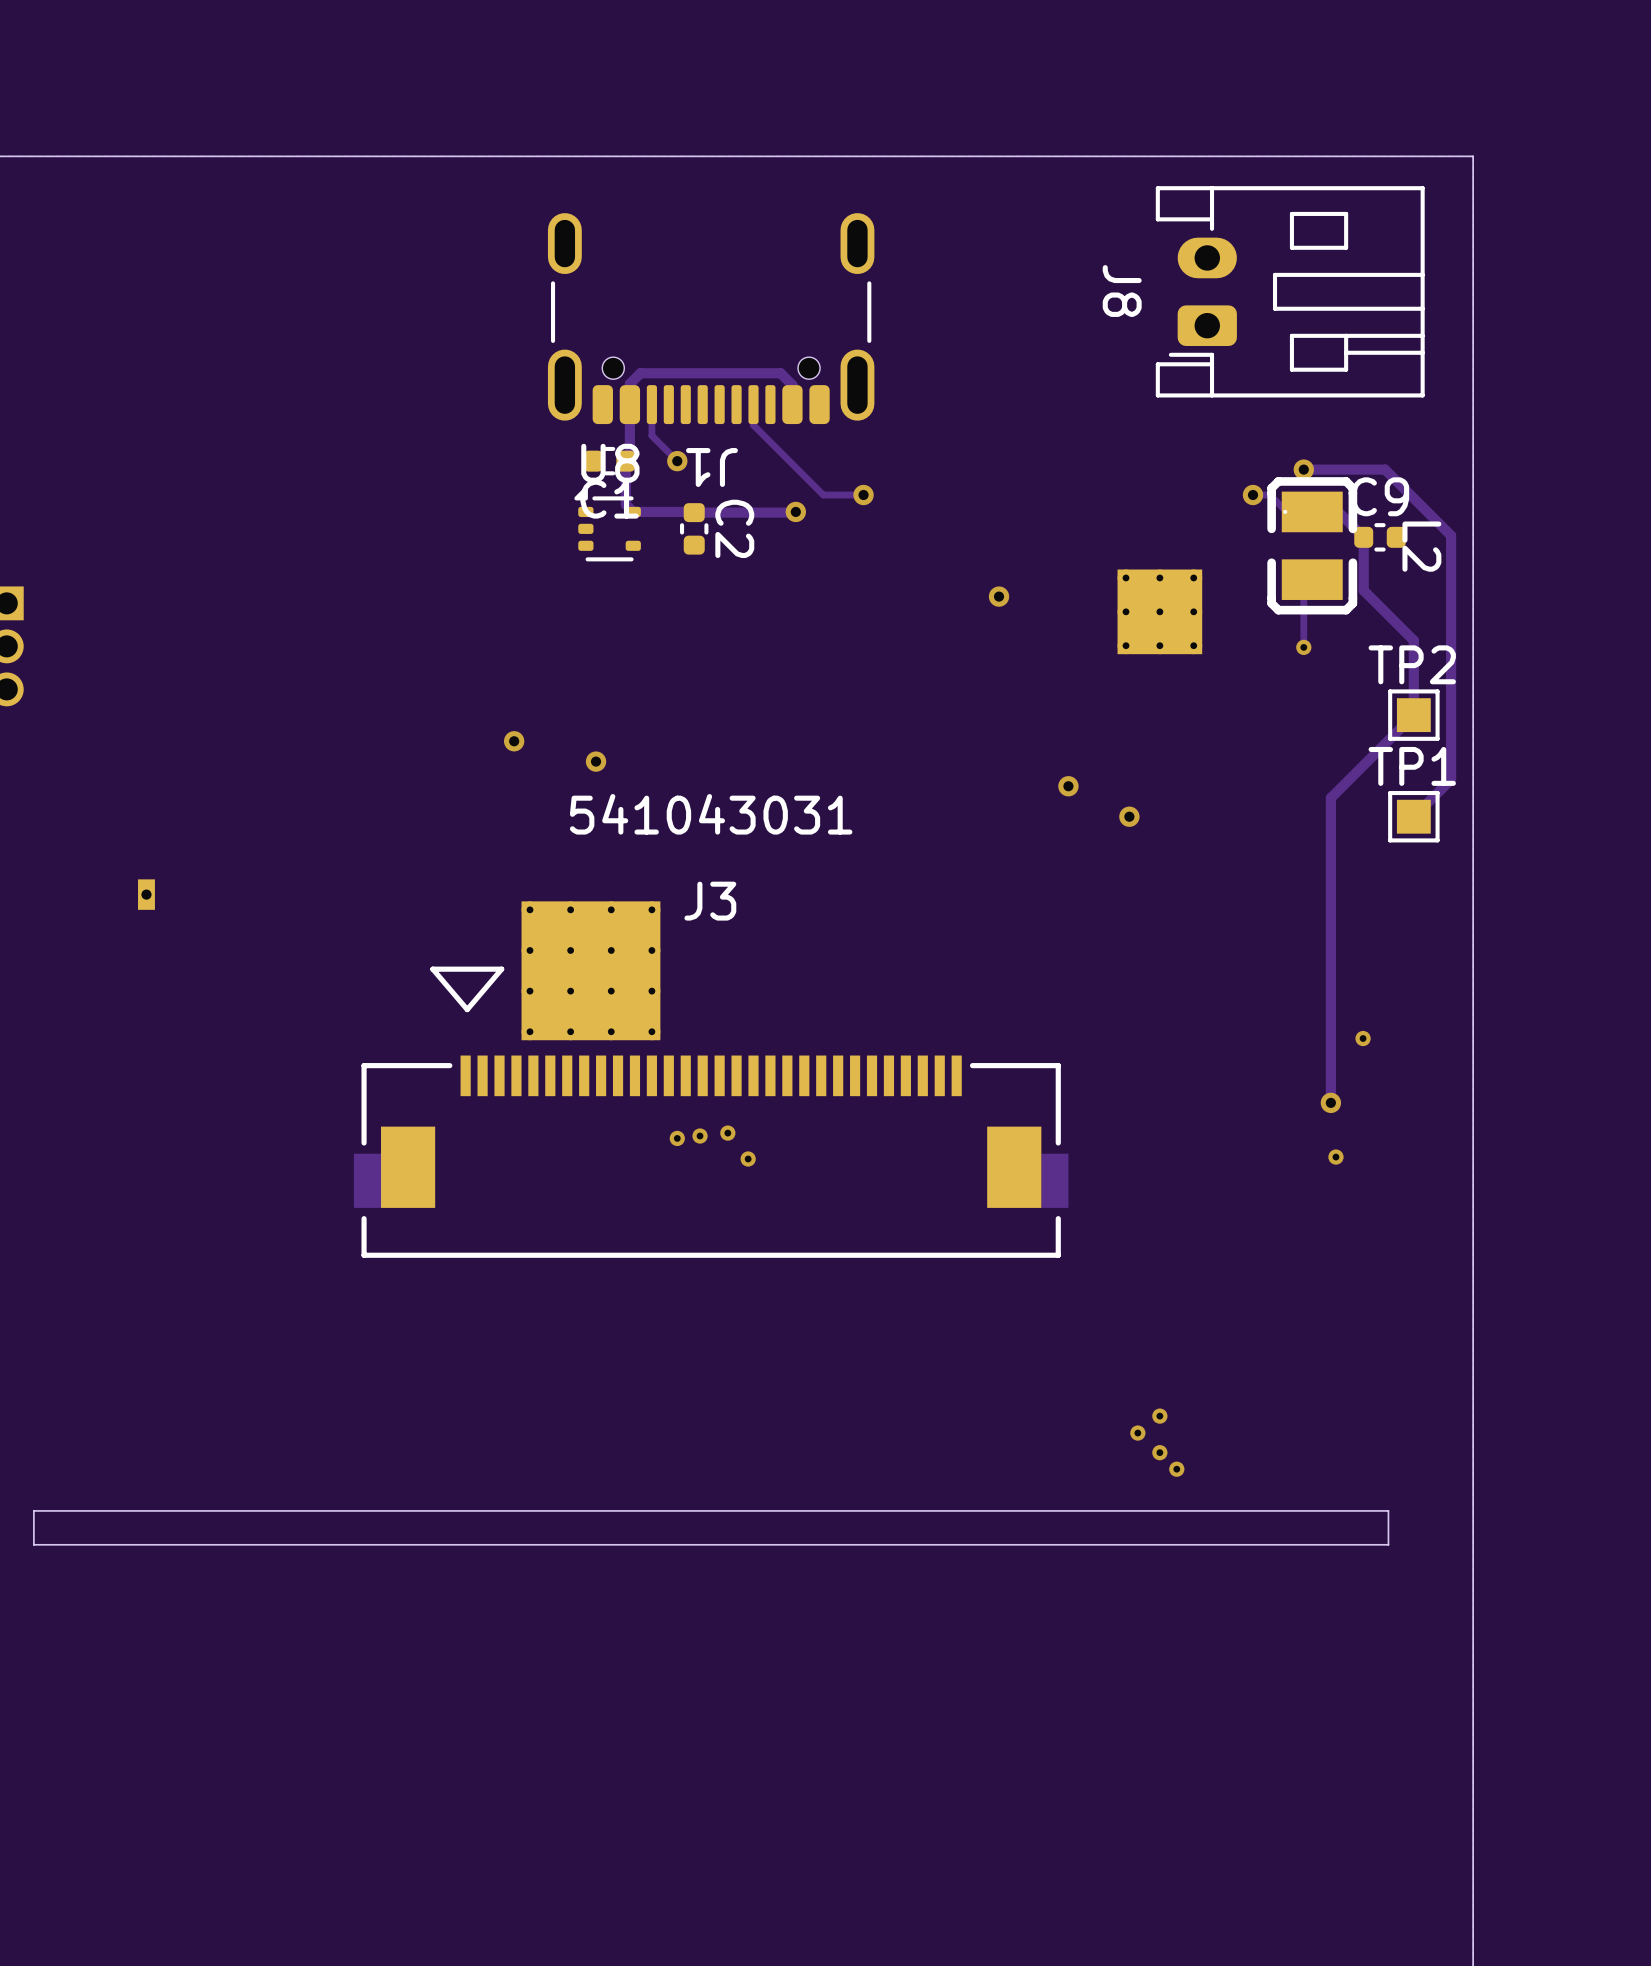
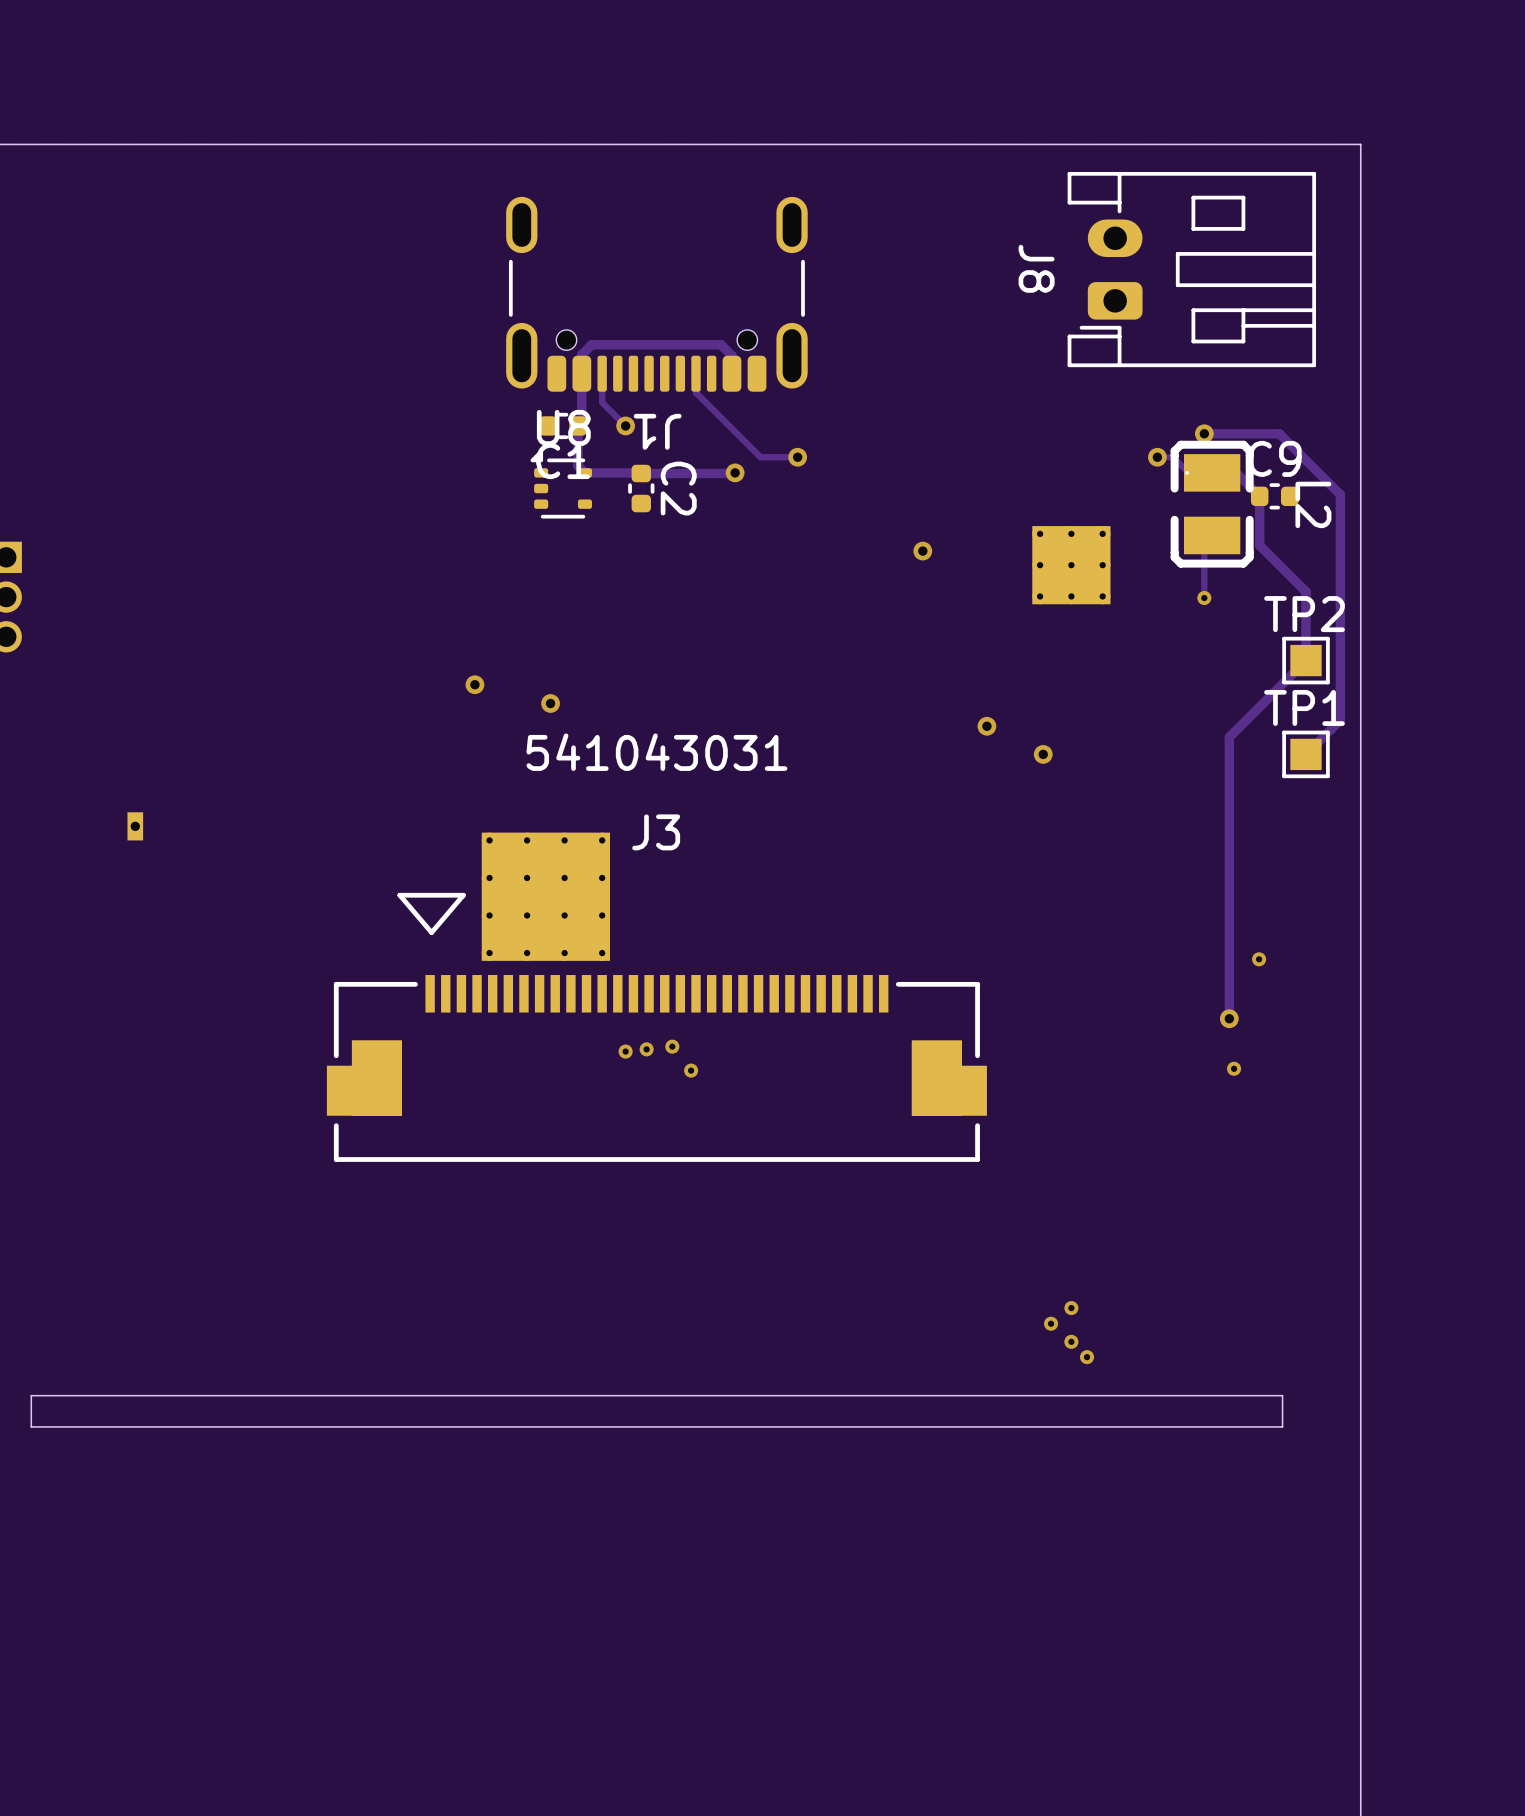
J3 footprint: [353, 966, 1069, 1258] -> [326, 892, 987, 1162]

